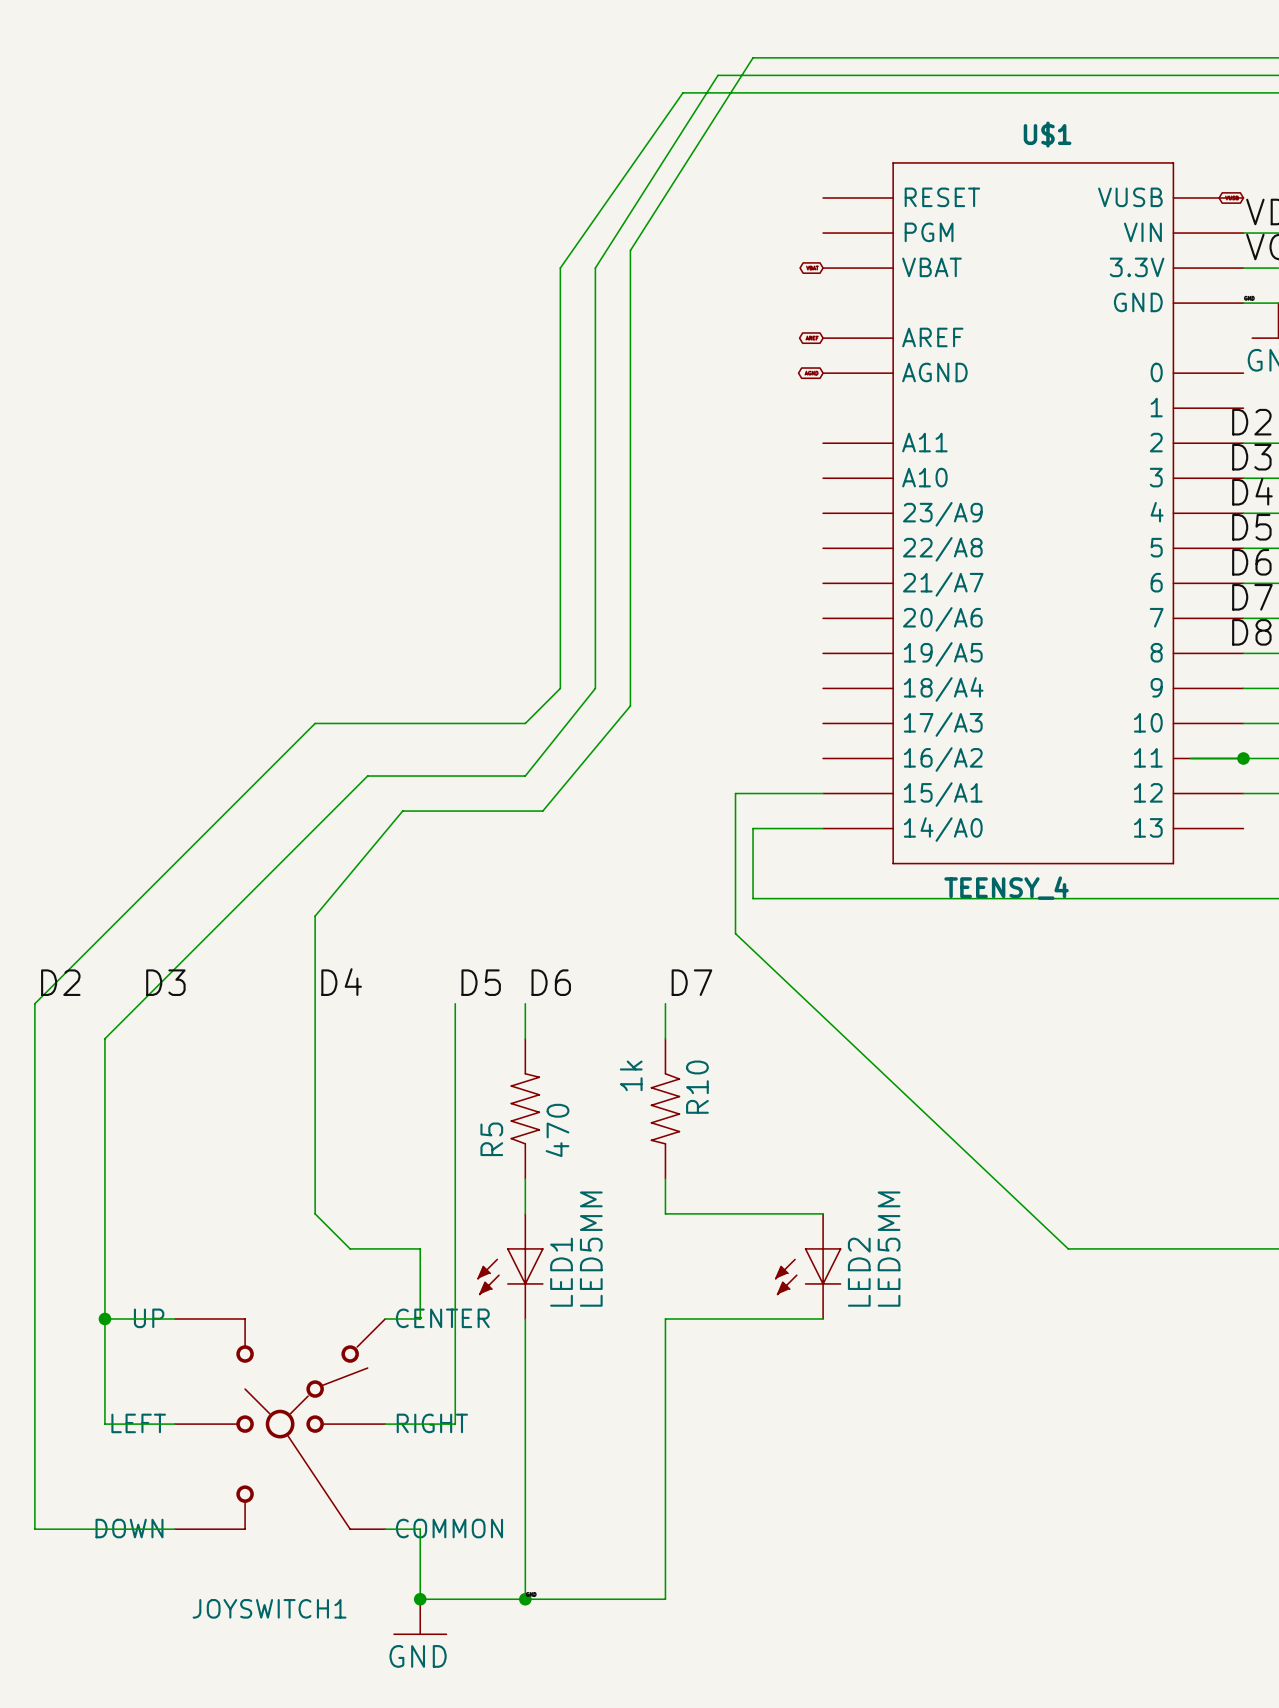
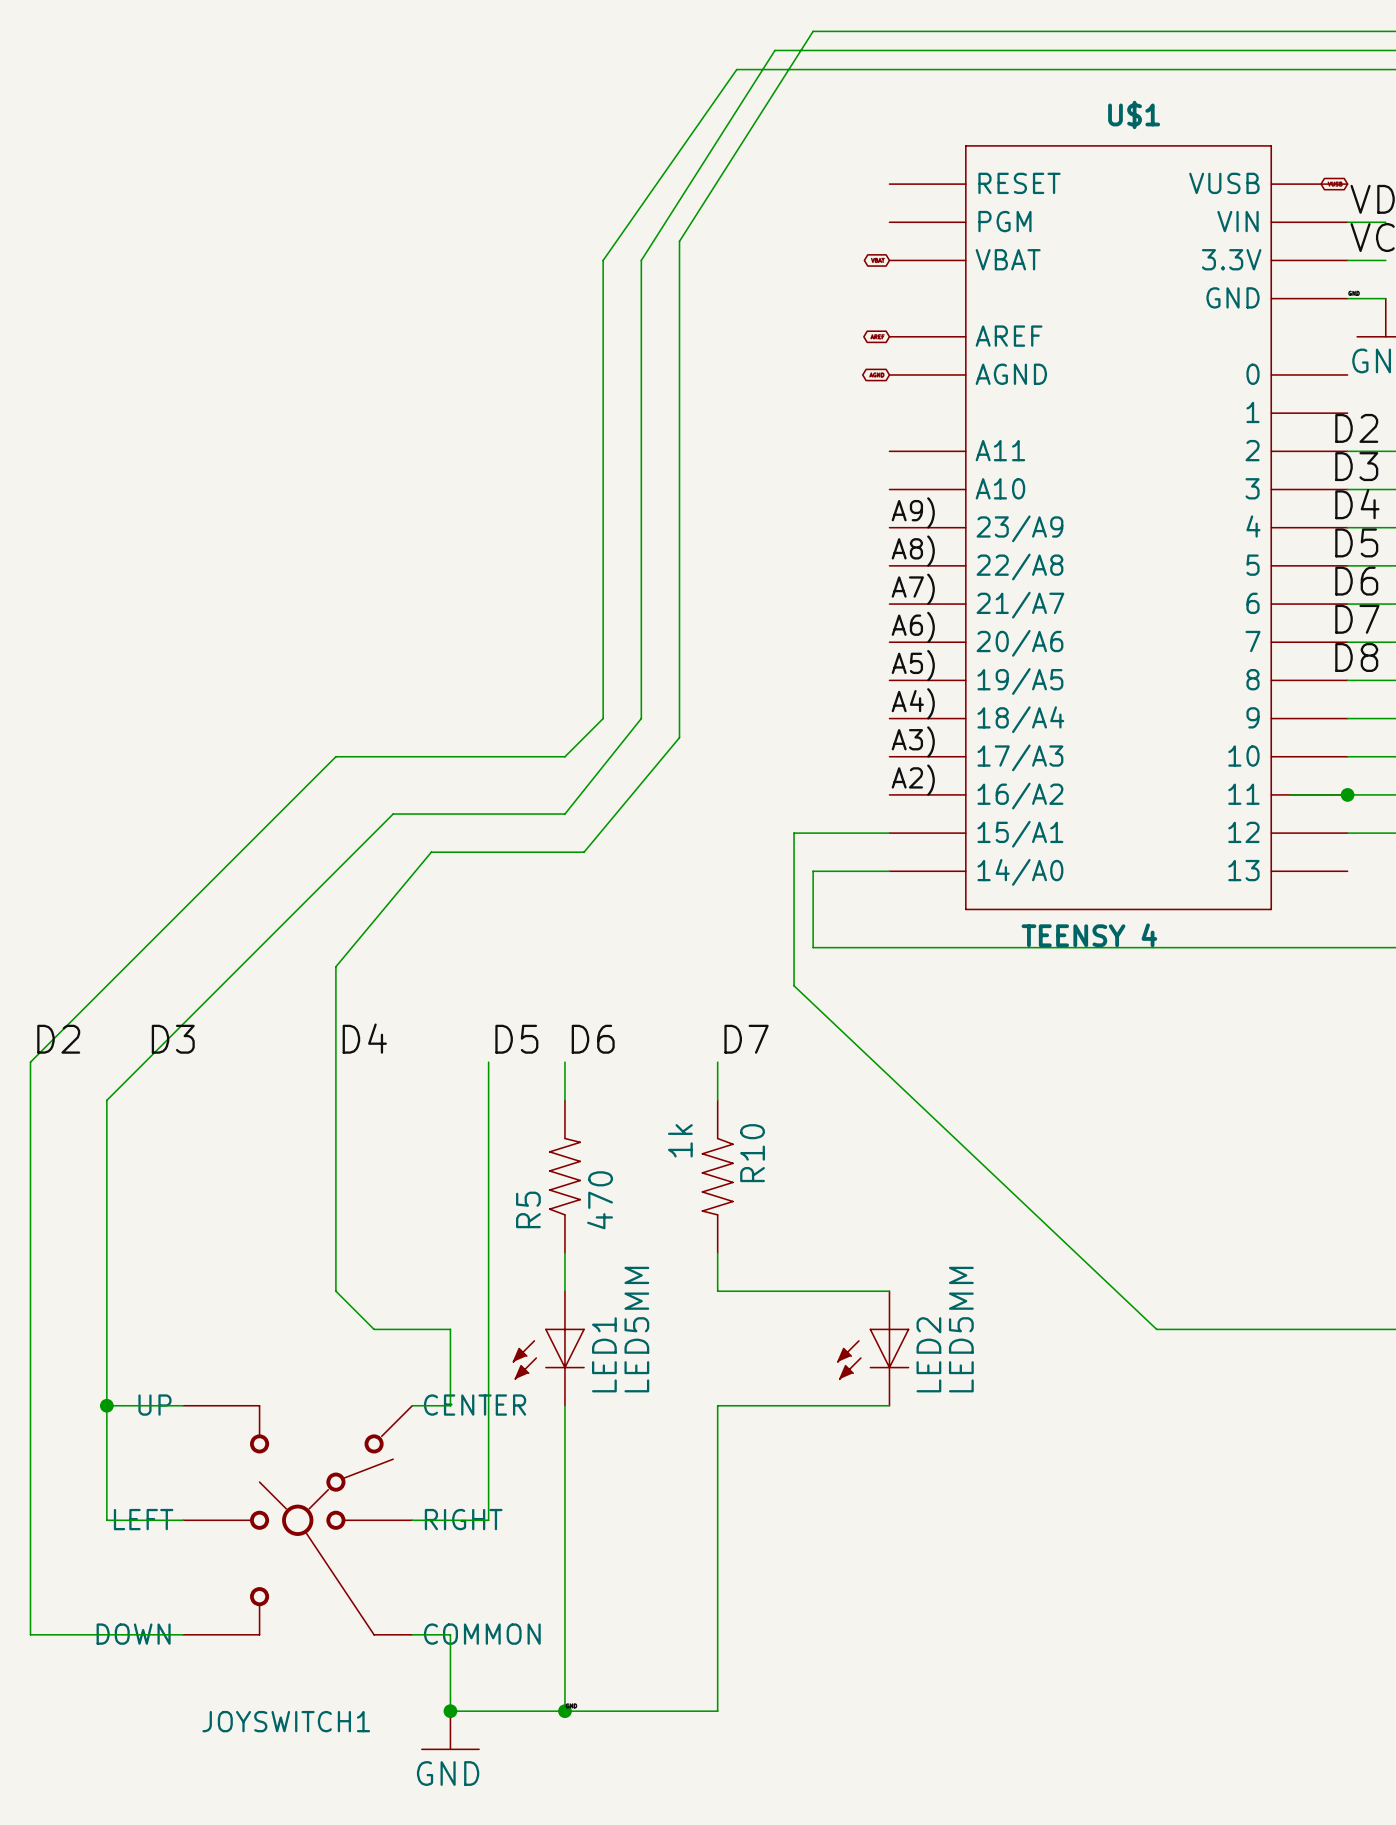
label: none -> A9) (913, 512)
label: none -> A8) (913, 551)
label: none -> A7) (913, 589)
label: none -> A6) (913, 627)
label: none -> A5) (913, 665)
label: none -> A4) (913, 703)
label: none -> A3) (913, 741)
label: none -> A2) (913, 780)
U$1 value: TEENSY_4 (1006, 888) -> TEENSY 4 (1089, 935)

